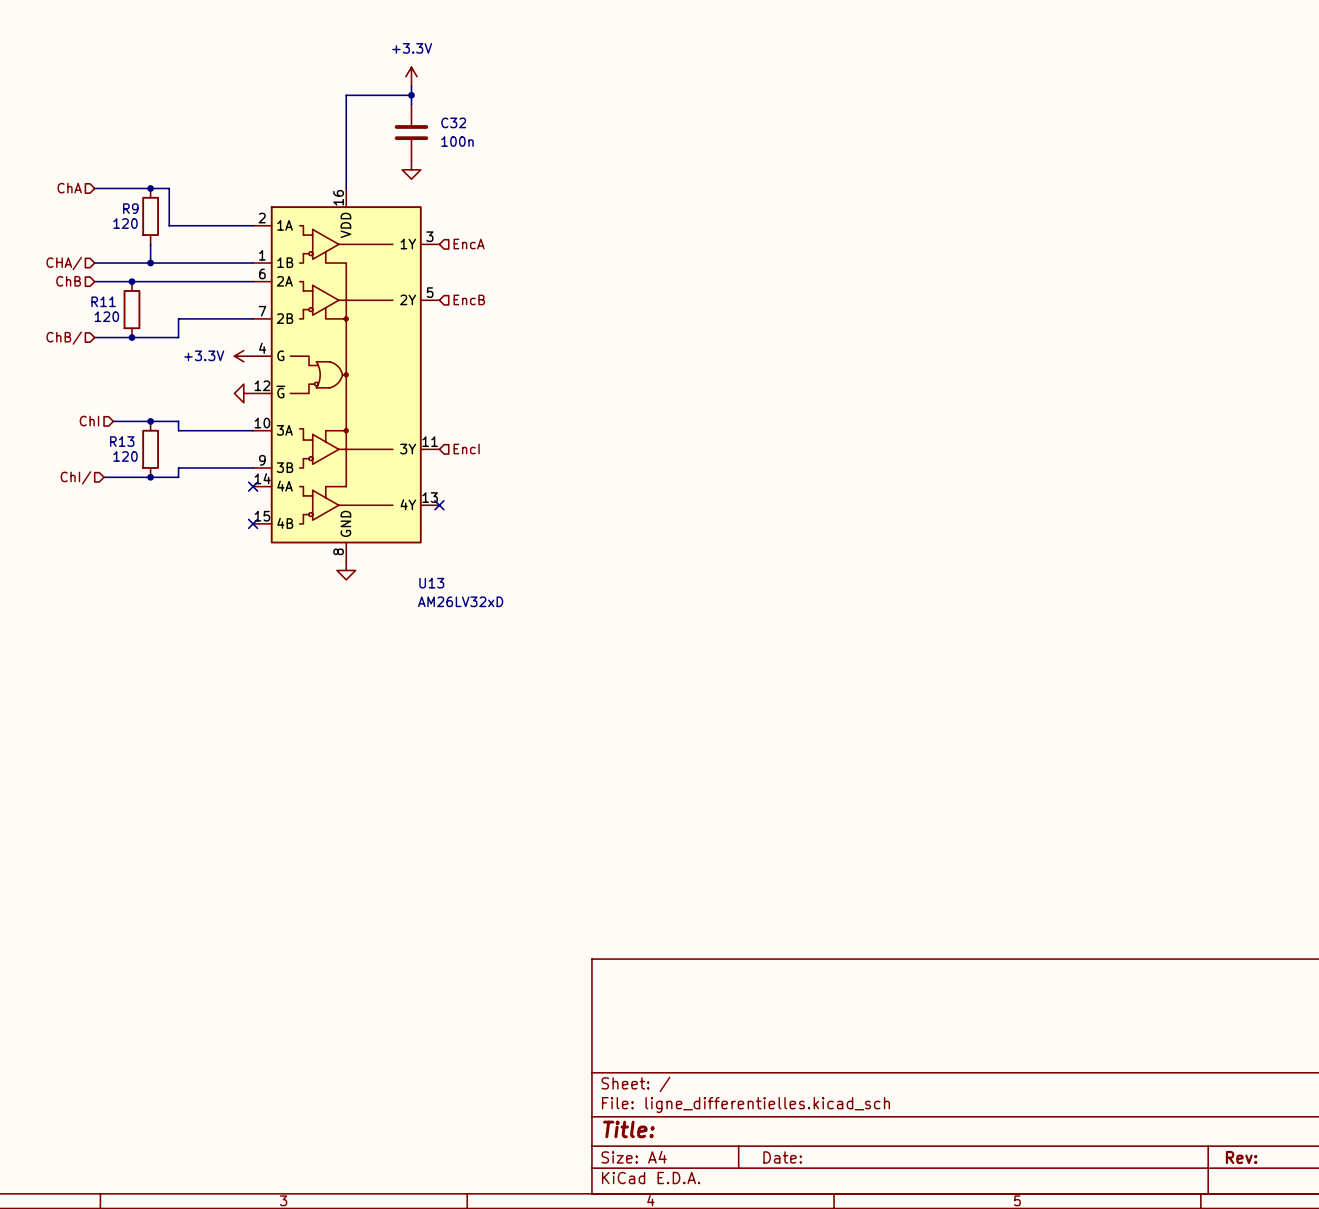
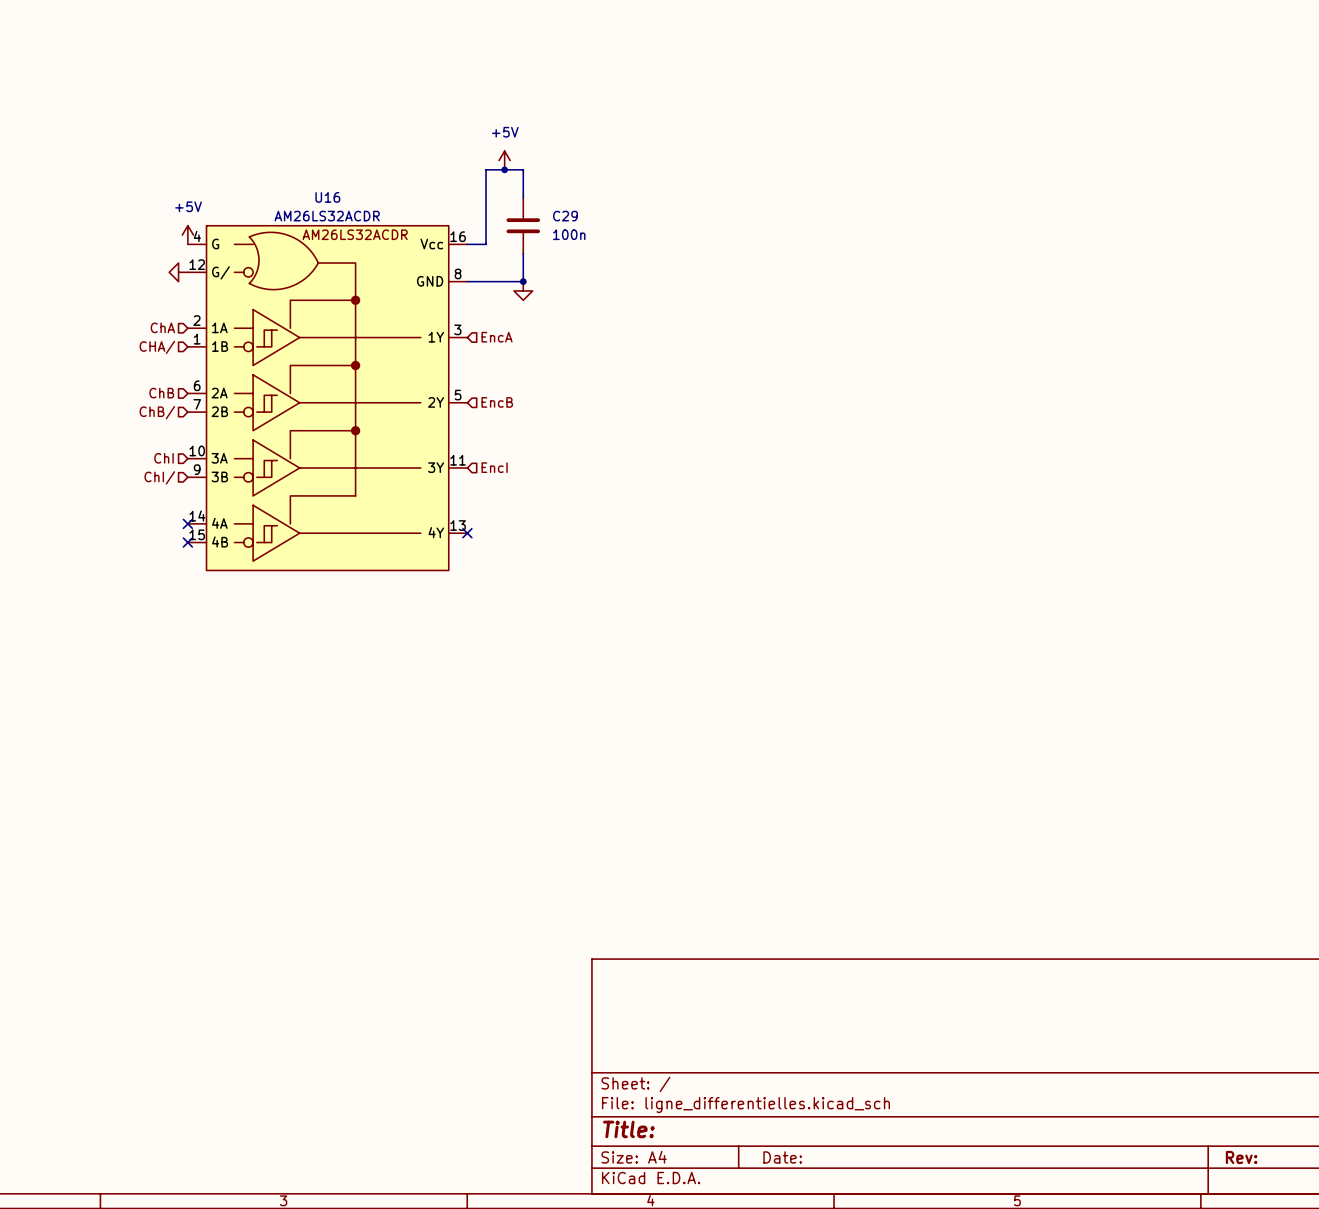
power symbol: +3.3V (411, 76) -> none
wire: (411, 85) (411, 104) -> none
wire: (411, 95) (346, 95) (346, 188) -> none
junction: (411, 95) -> none
C32: 100n (411, 132) -> none
power symbol: none -> +5V (504, 160)
power symbol: (411, 169) -> none
junction: none -> (504, 169)
hierarchical label position: ChA (69, 188) -> ChA (162, 327)
wire: (94, 188) (169, 188) (169, 225) (253, 225) -> none
junction: (150, 188) -> none
wire: none -> (523, 197) (523, 169) (486, 169) (486, 244) (467, 244)
R9: 120 (150, 216) -> none
C29: none -> 100n (523, 225)
power symbol: none -> +5V (187, 235)
wire: (150, 244) (150, 263) -> none
hierarchical label position: EncA (469, 244) -> EncA (497, 337)
wire: none -> (523, 253) (523, 281) (467, 281)
hierarchical label position: CHA/ (64, 263) -> CHA/ (157, 347)
wire: (94, 263) (253, 263) -> none
junction: (150, 263) -> none
power symbol: none -> (178, 272)
hierarchical label position: ChB (68, 281) -> ChB (161, 393)
wire: (94, 281) (253, 281) -> none
junction: (131, 281) -> none
junction: none -> (523, 281)
power symbol: none -> (523, 290)
hierarchical label position: EncB (469, 299) -> EncB (497, 402)
R11: 120 (131, 309) -> none
wire: (253, 318) (178, 318) (178, 337) (94, 337) -> none
junction: (131, 337) -> none
hierarchical label position: ChB/ (64, 338) -> ChB/ (157, 412)
power symbol: +3.3V (243, 356) -> none
U13: AM26LV32xD (346, 374) -> none
power symbol: (243, 393) -> none
U16: none -> AM26LS32ACDR (327, 398)
hierarchical label position: ChI (89, 421) -> ChI (163, 458)
wire: (113, 421) (178, 421) (178, 430) (253, 430) -> none
junction: (150, 421) -> none
R13: 120 (150, 449) -> none
hierarchical label position: EncI (466, 449) -> EncI (494, 467)
wire: (253, 467) (178, 467) (178, 477) (104, 477) -> none
hierarchical label position: ChI/ (75, 477) -> ChI/ (159, 477)
junction: (150, 477) -> none
no-connect mark: (253, 486) -> none
no-connect mark position: (439, 505) -> (467, 533)
no-connect mark: none -> (187, 523)
no-connect mark: (253, 523) -> none
no-connect mark: none -> (187, 542)
power symbol: (346, 570) -> none

